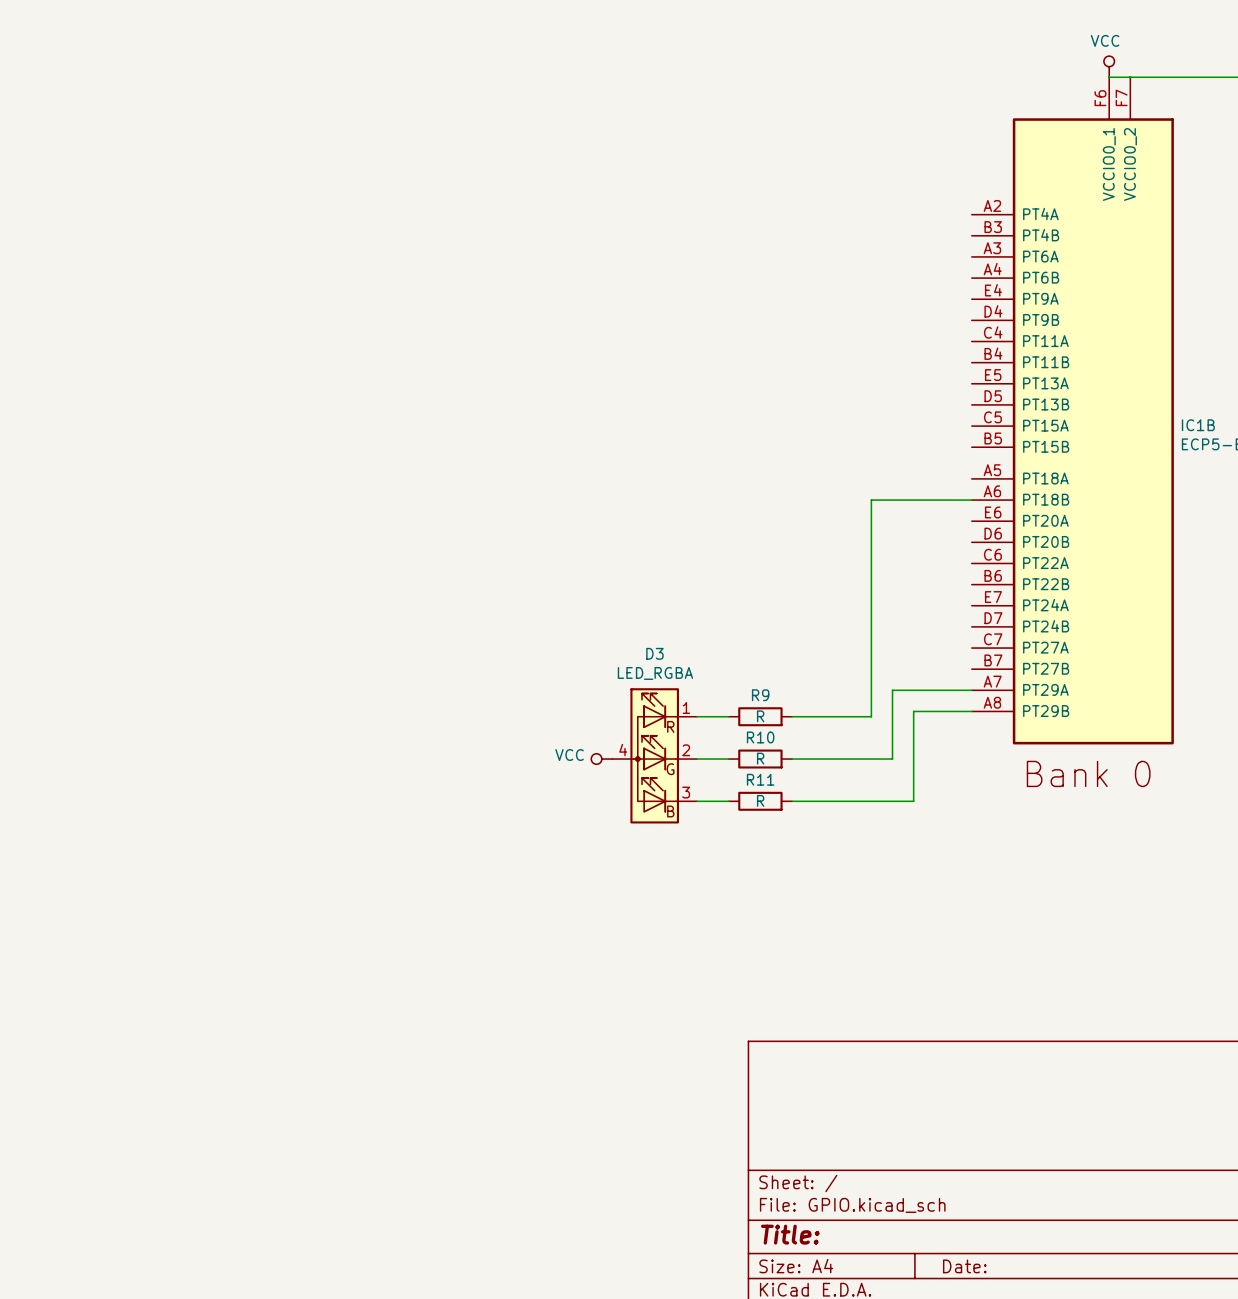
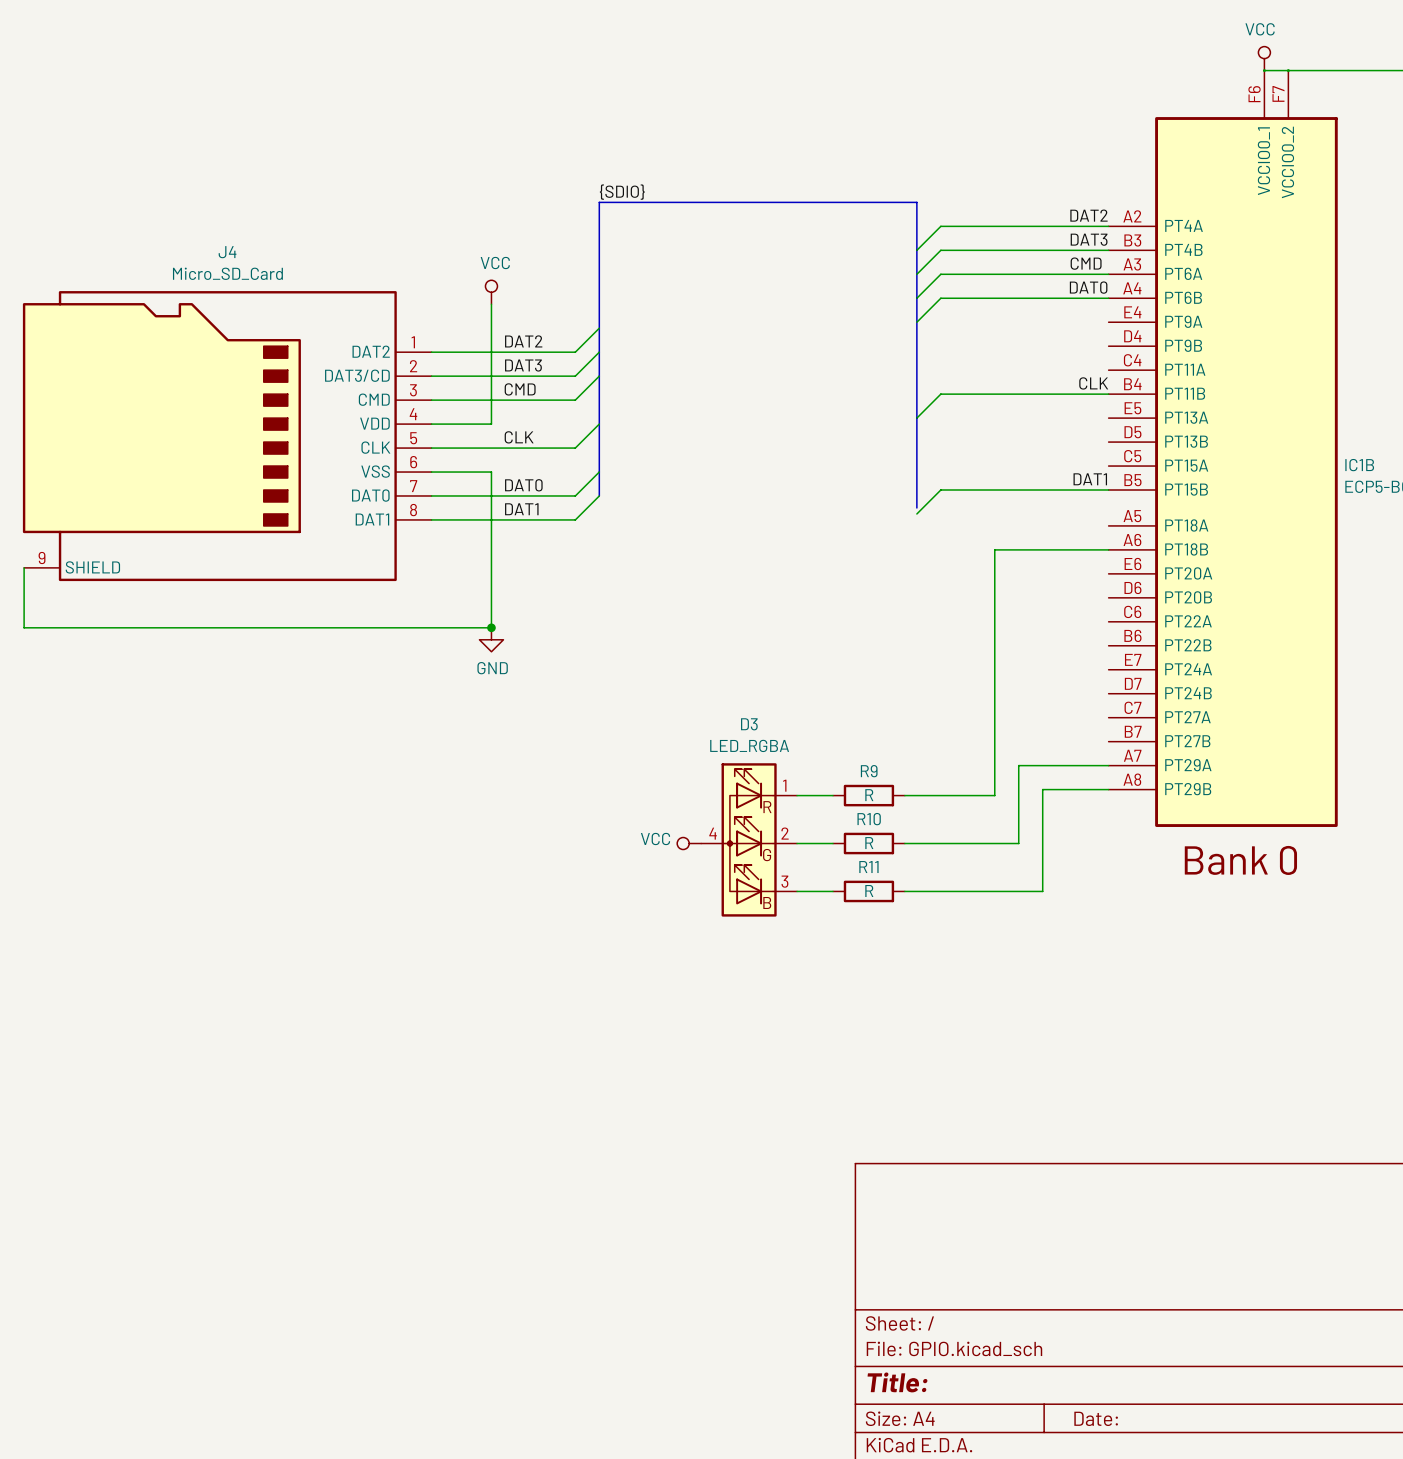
label: none -> {SDIO} (622, 192)
label: none -> DAT2 (1088, 215)
wire: none -> (940, 226) (916, 250)
wire: none -> (940, 226) (1108, 226)
label: none -> DAT3 (1089, 239)
wire: none -> (940, 250) (916, 274)
wire: none -> (940, 250) (1108, 250)
label: none -> CMD (1086, 263)
wire: none -> (940, 274) (916, 298)
wire: none -> (940, 274) (1108, 274)
label: none -> DAT0 (1088, 287)
power symbol: none -> VCC (491, 292)
wire: none -> (940, 298) (916, 322)
wire: none -> (940, 298) (1108, 298)
wire: none -> (491, 304) (491, 424) (431, 424)
wire: none -> (599, 328) (575, 352) (431, 352)
label: none -> DAT2 (523, 341)
wire: none -> (599, 352) (575, 376) (431, 376)
label: none -> DAT3 (523, 365)
wire: none -> (599, 376) (575, 400) (431, 400)
label: none -> CLK (1093, 383)
label: none -> CMD (520, 389)
wire: none -> (940, 394) (916, 418)
wire: none -> (940, 394) (1108, 394)
wire: none -> (599, 424) (575, 448) (431, 448)
J4: none -> Micro_SD_Card (227, 436)
label: none -> CLK (519, 437)
wire: none -> (431, 472) (491, 472) (491, 627) (24, 627) (24, 567)
wire: none -> (599, 472) (575, 495) (431, 495)
label: none -> DAT1 (1090, 479)
label: none -> DAT0 (523, 485)
wire: none -> (940, 490) (916, 513)
wire: none -> (940, 490) (1108, 490)
wire: none -> (599, 495) (575, 519) (431, 519)
bus: none -> (599, 495) (599, 202) (916, 202) (916, 507)
label: none -> DAT1 (521, 509)
junction: none -> (491, 627)
power symbol: none -> GND (491, 639)

